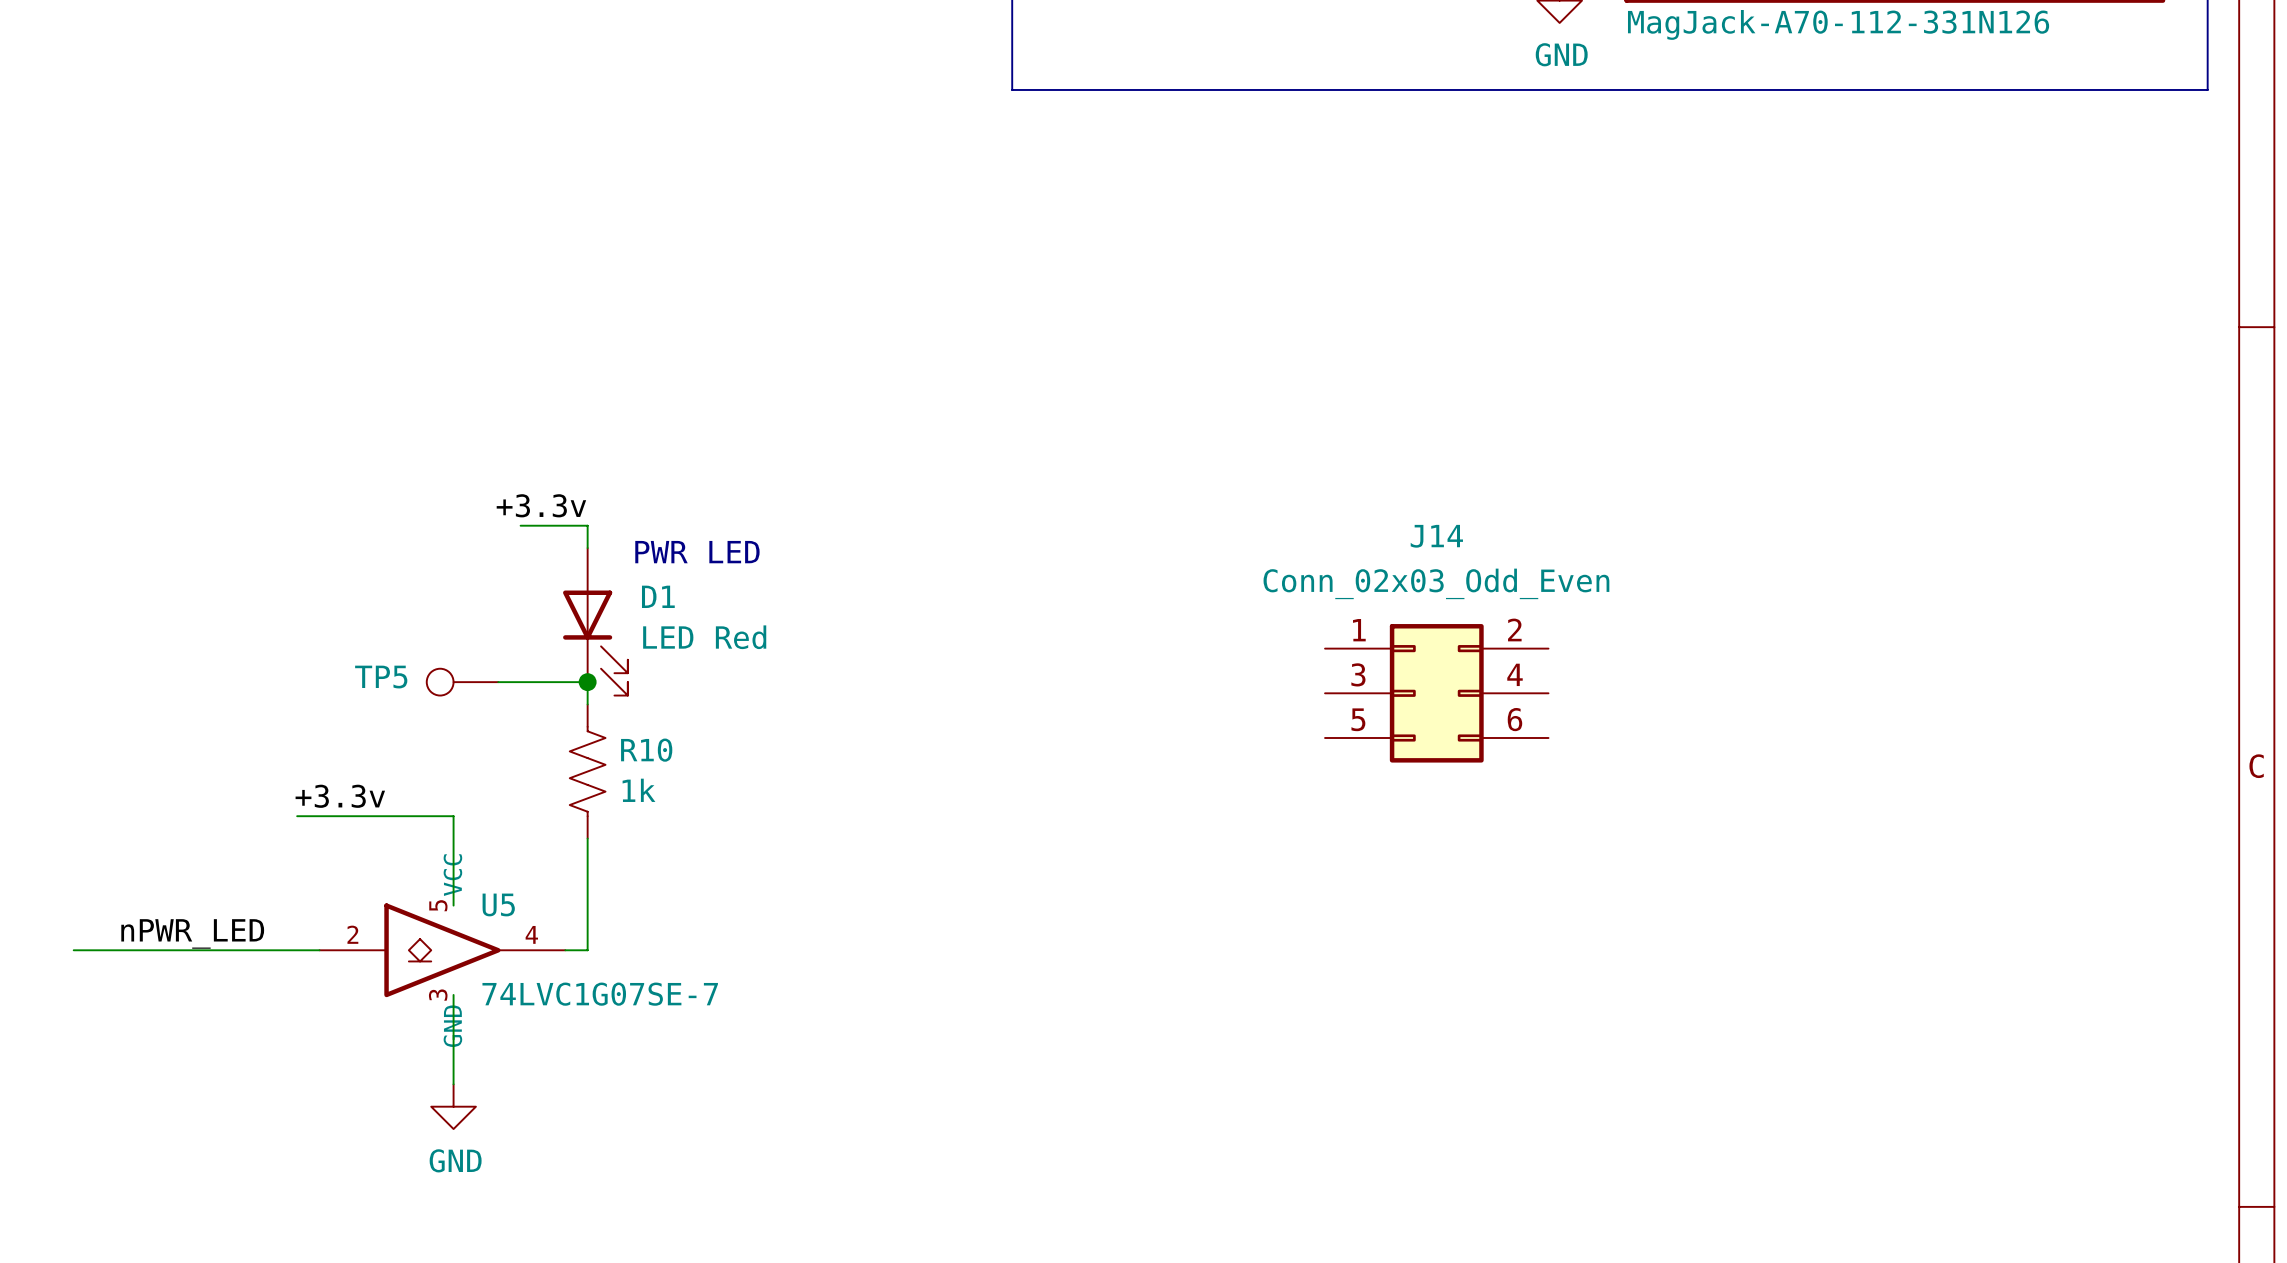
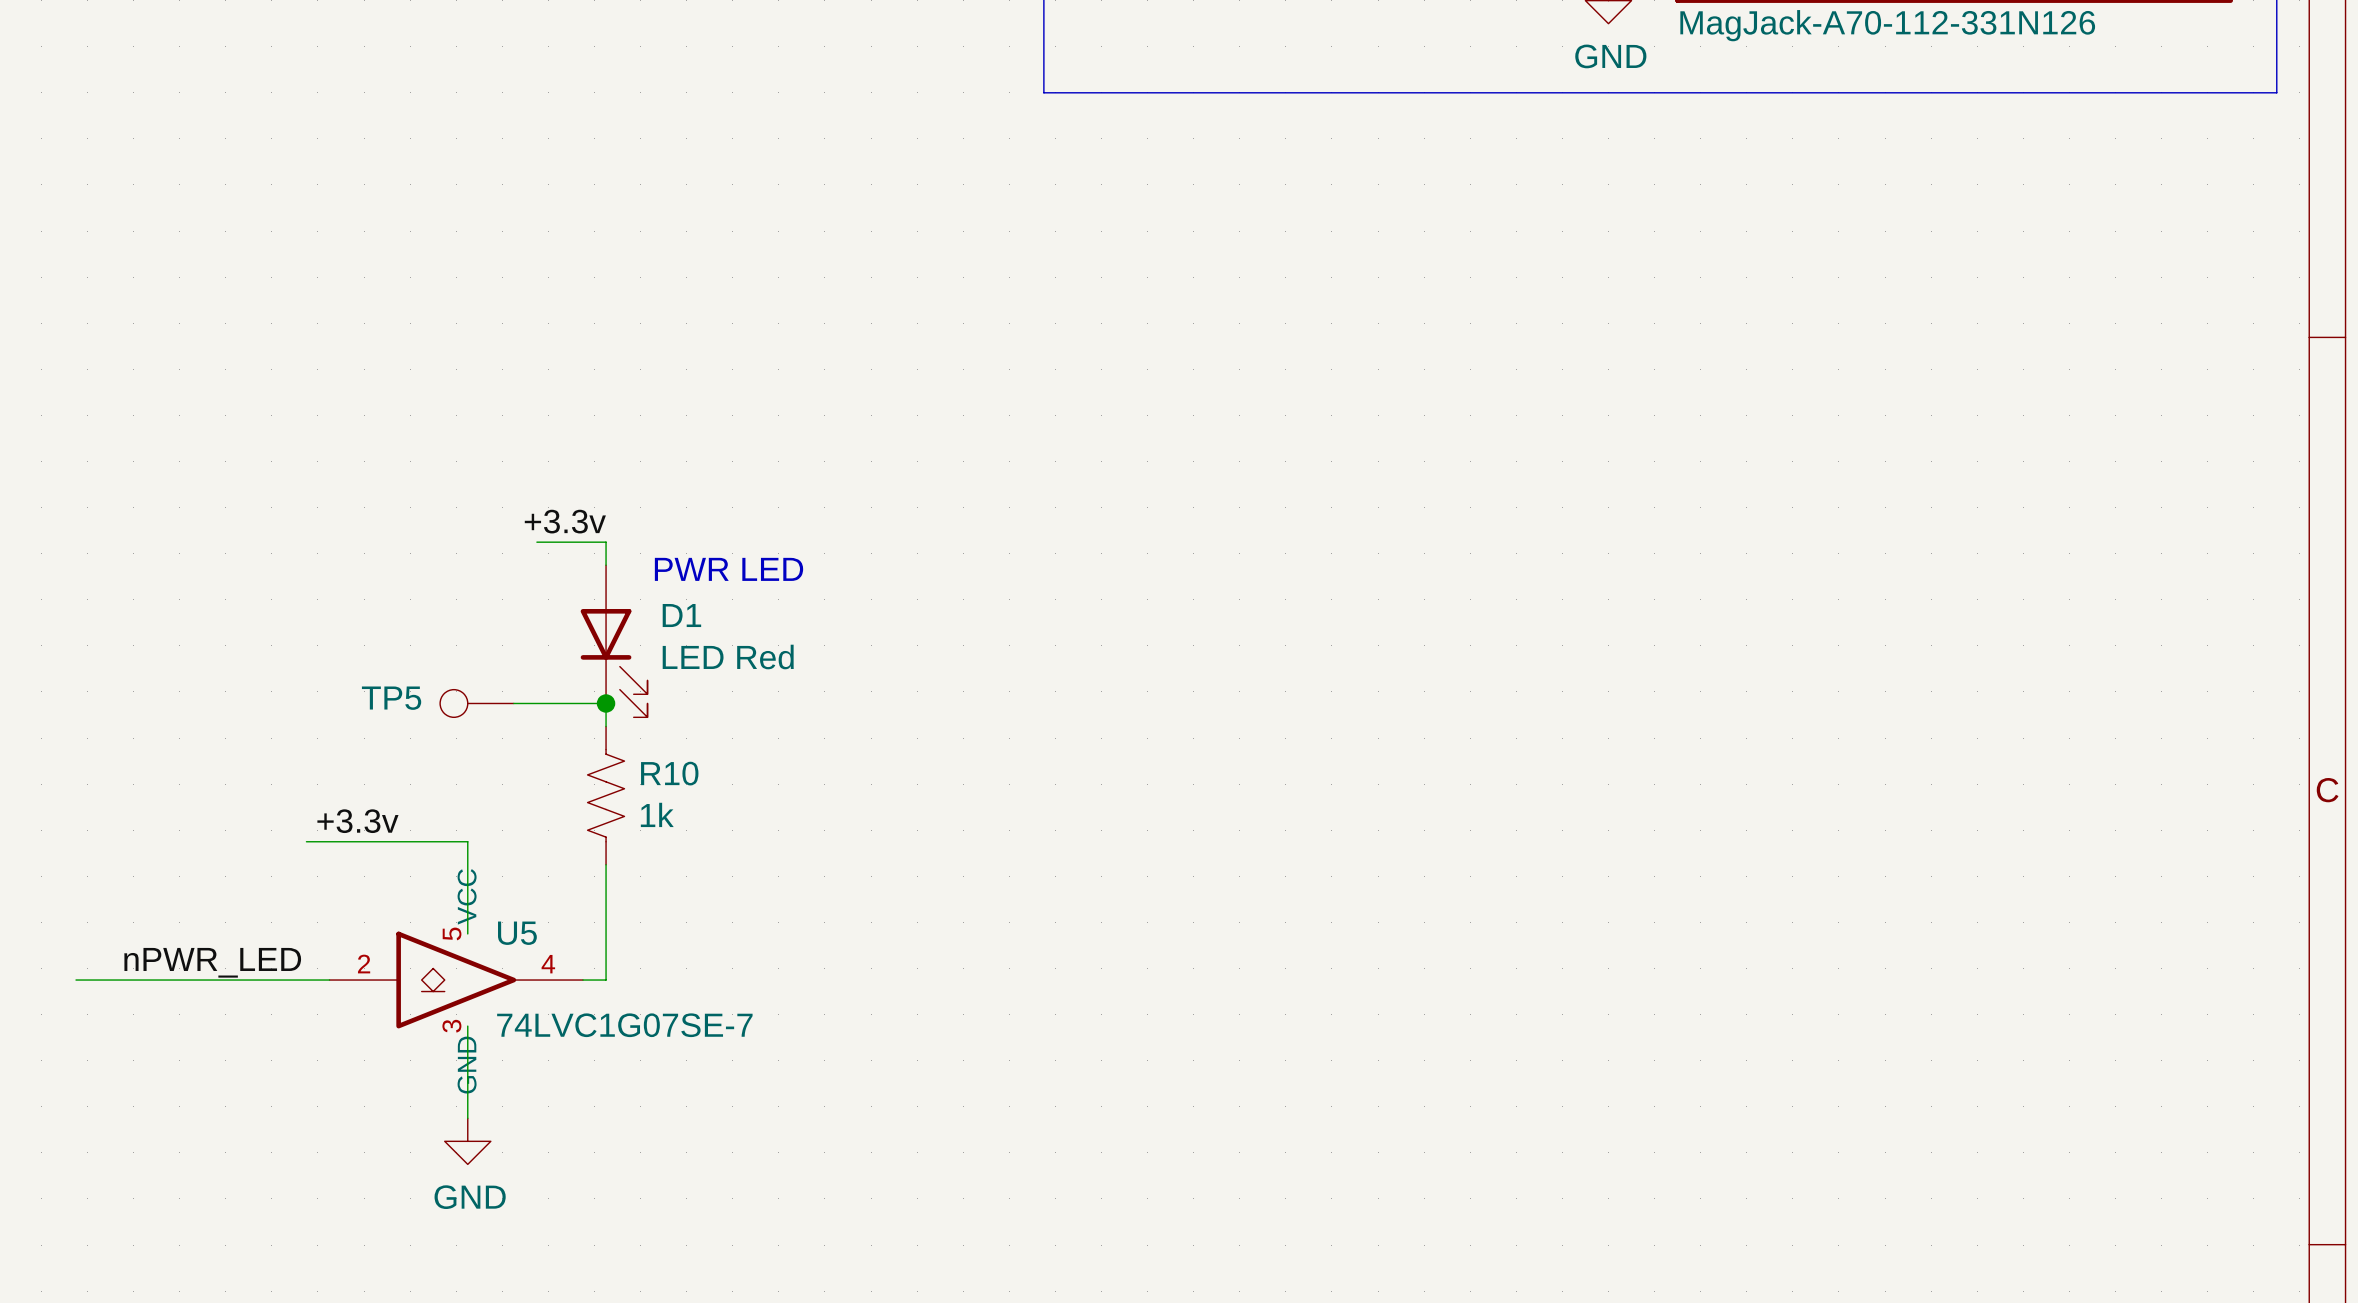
J14: Conn_02x03_Odd_Even (1436, 693) -> none

